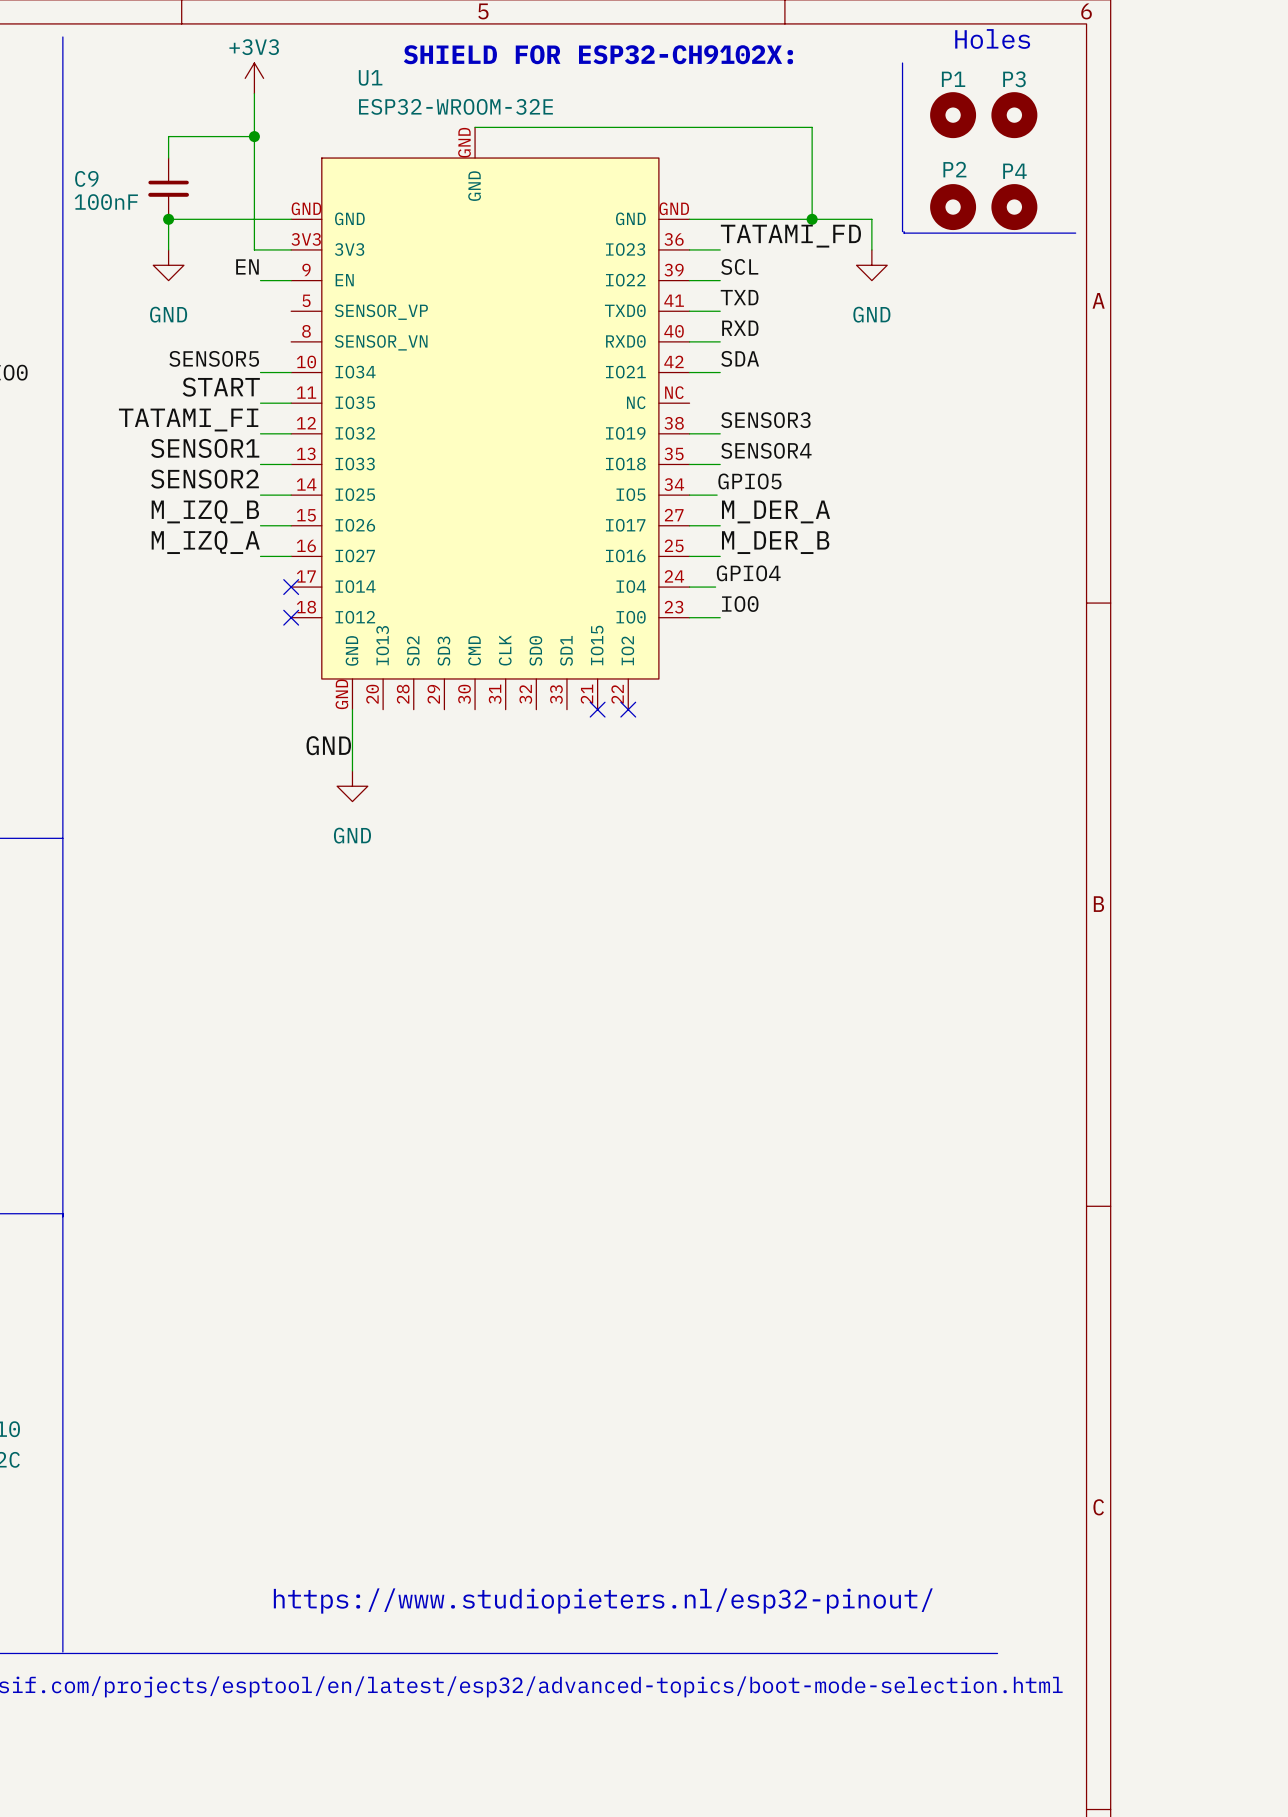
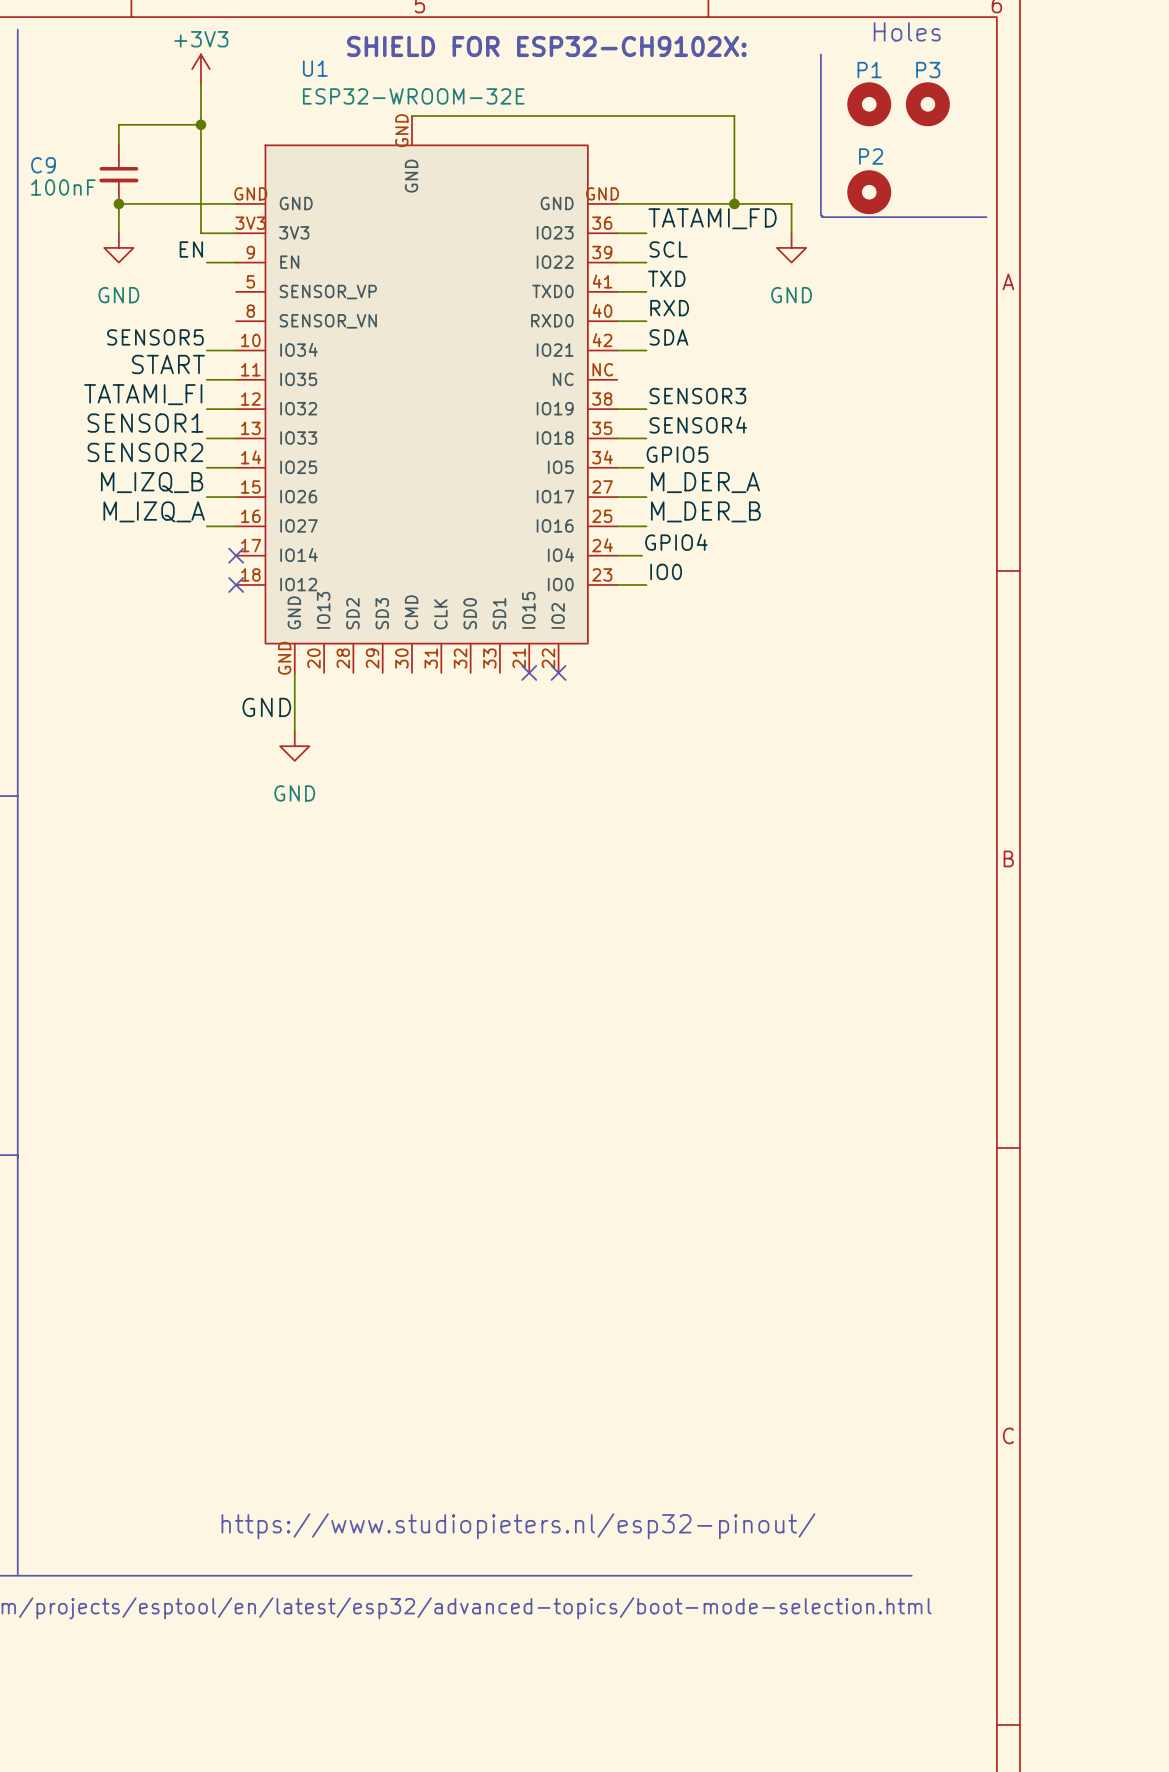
P4: (1014, 207) -> none

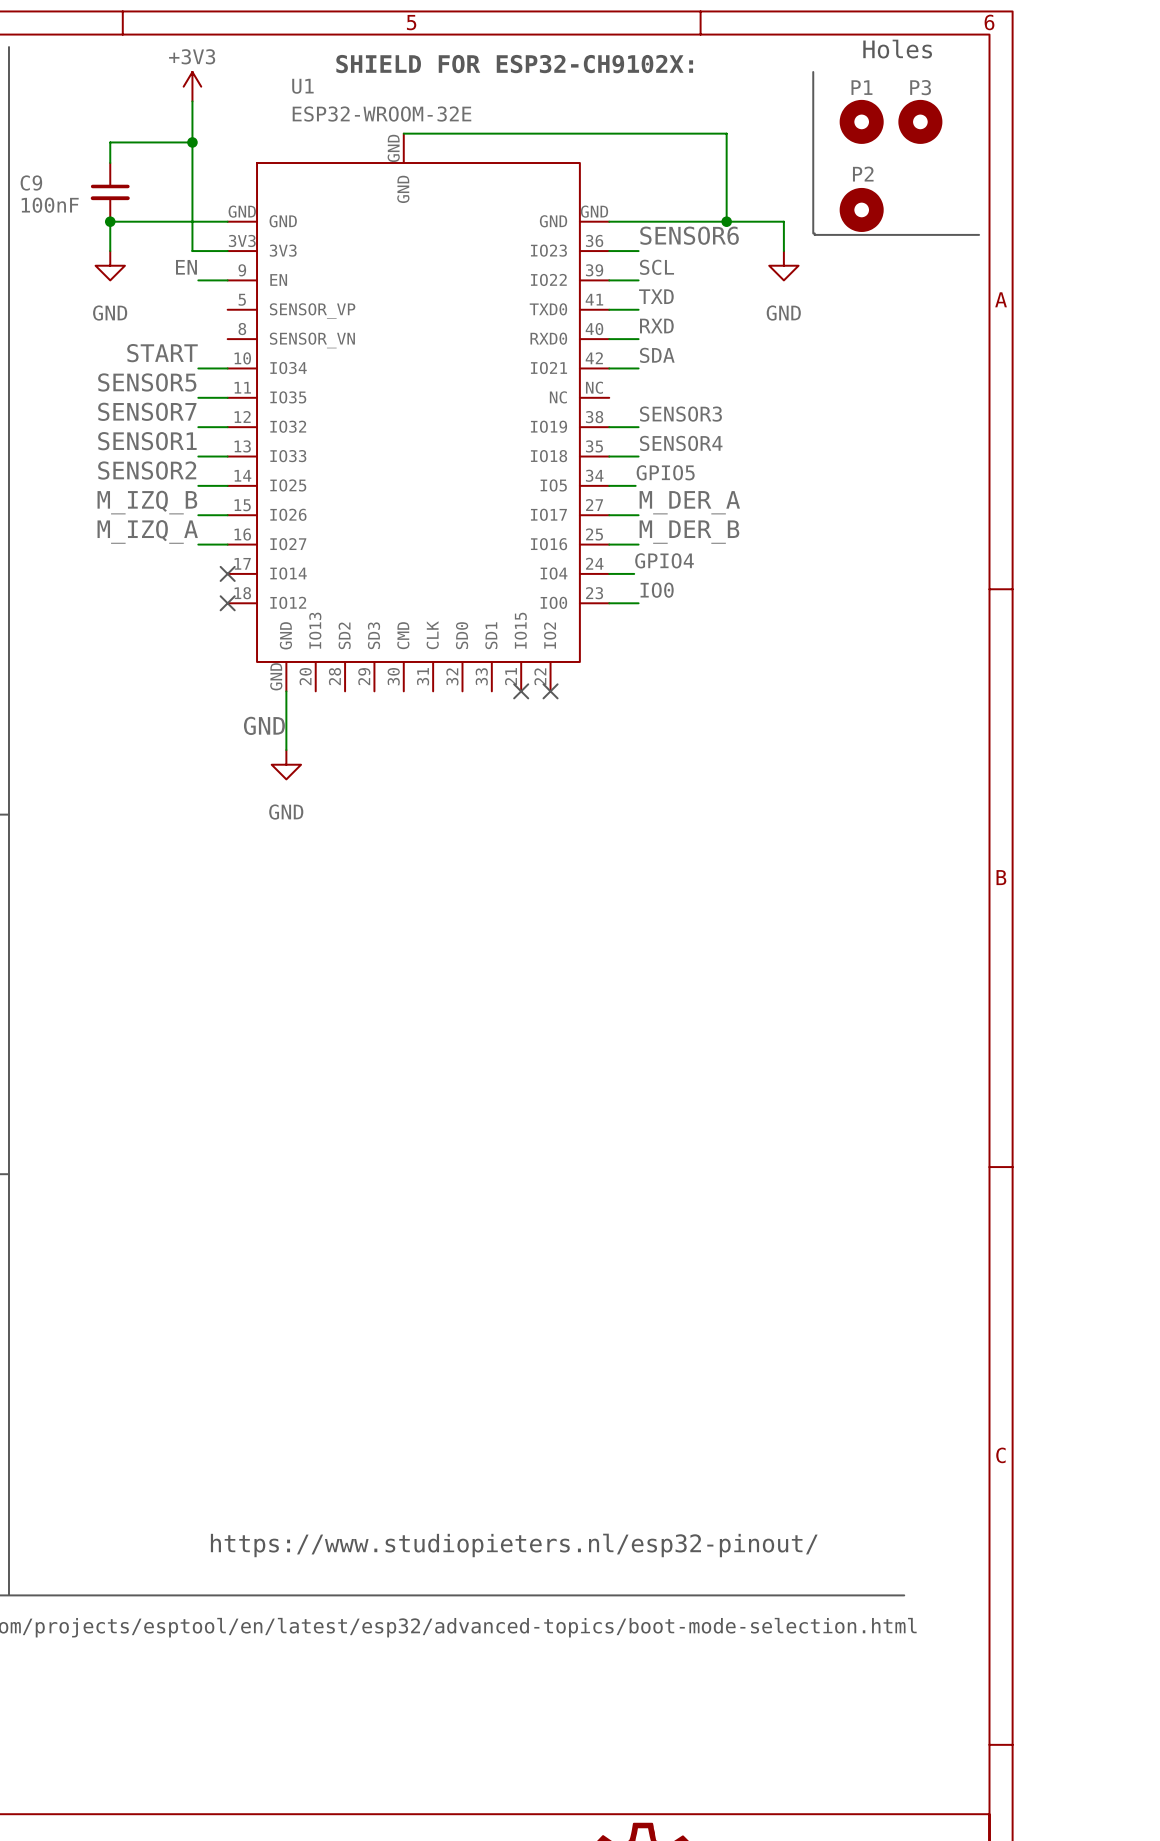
label: TATAMI_FD (712, 218) -> SENSOR6 (689, 235)
label: SENSOR5 (155, 337) -> START (162, 353)
label: START (168, 364) -> SENSOR5 (147, 382)
label: TATAMI_FI (143, 394) -> SENSOR7 (147, 411)

